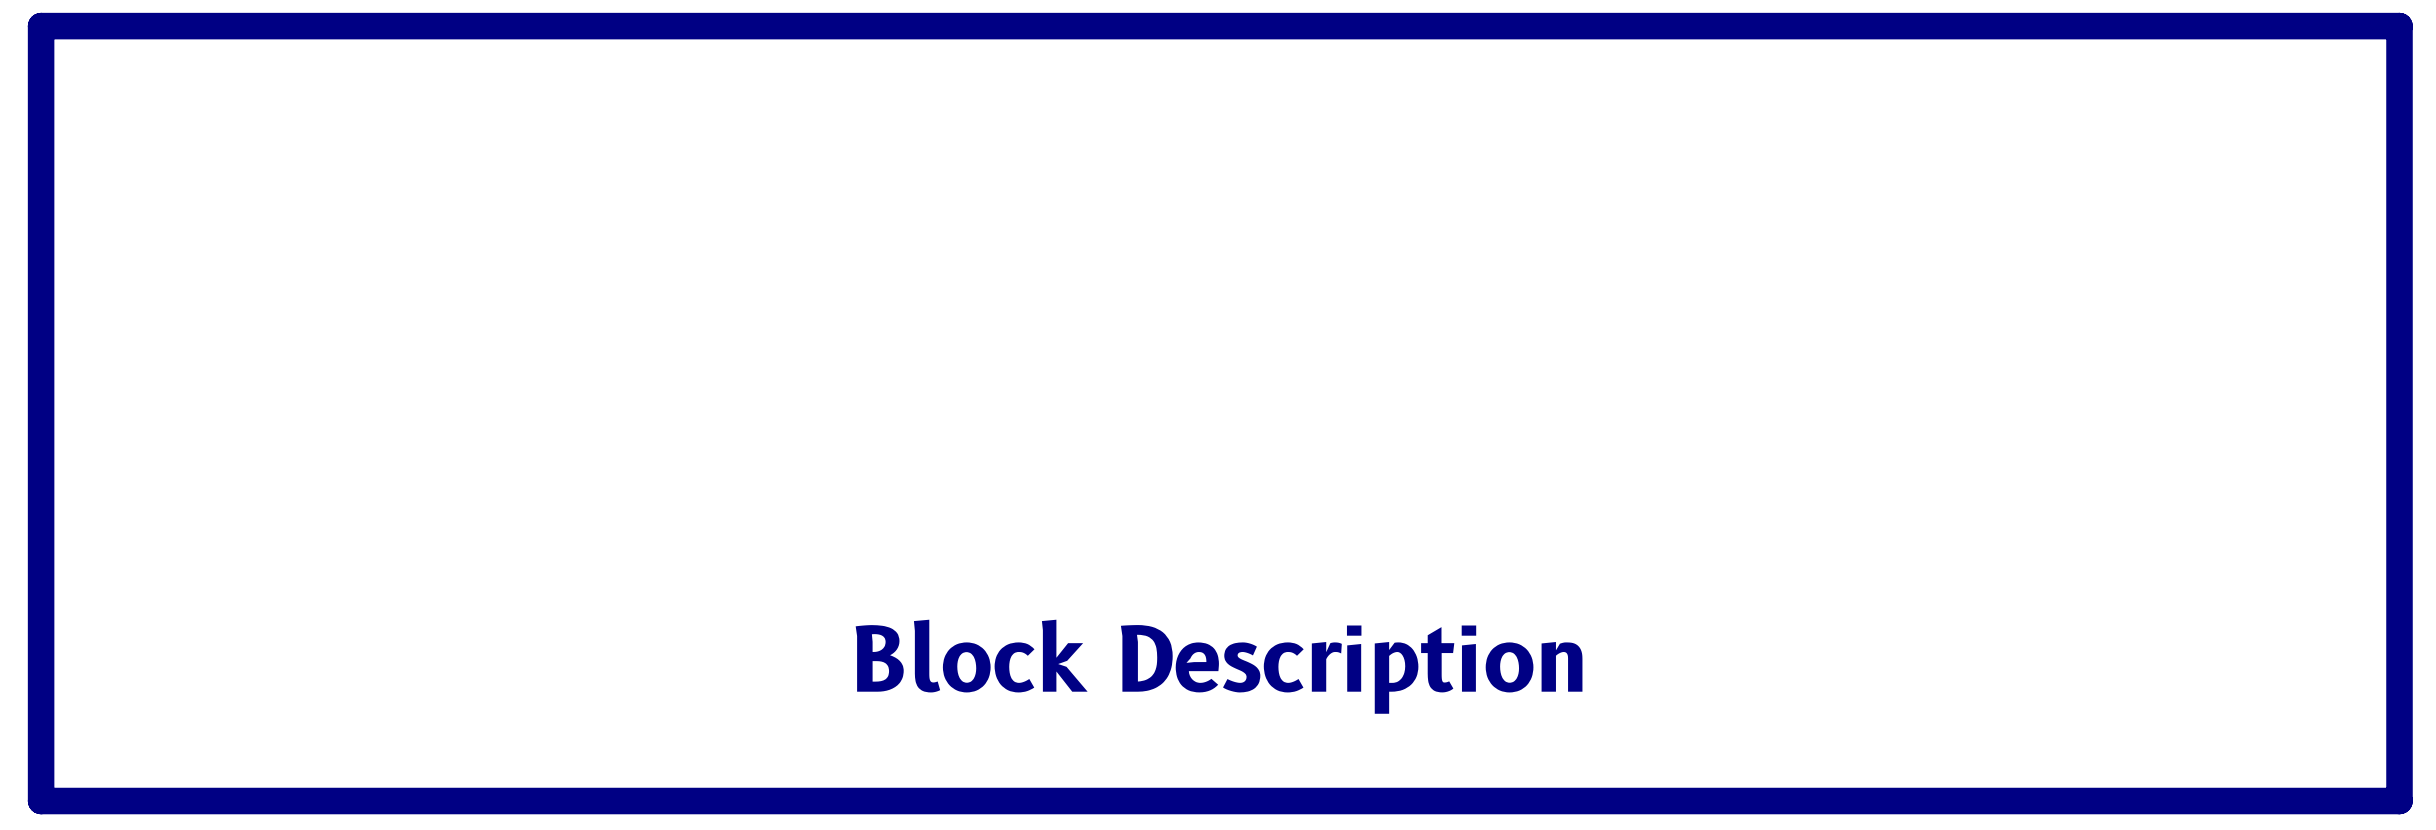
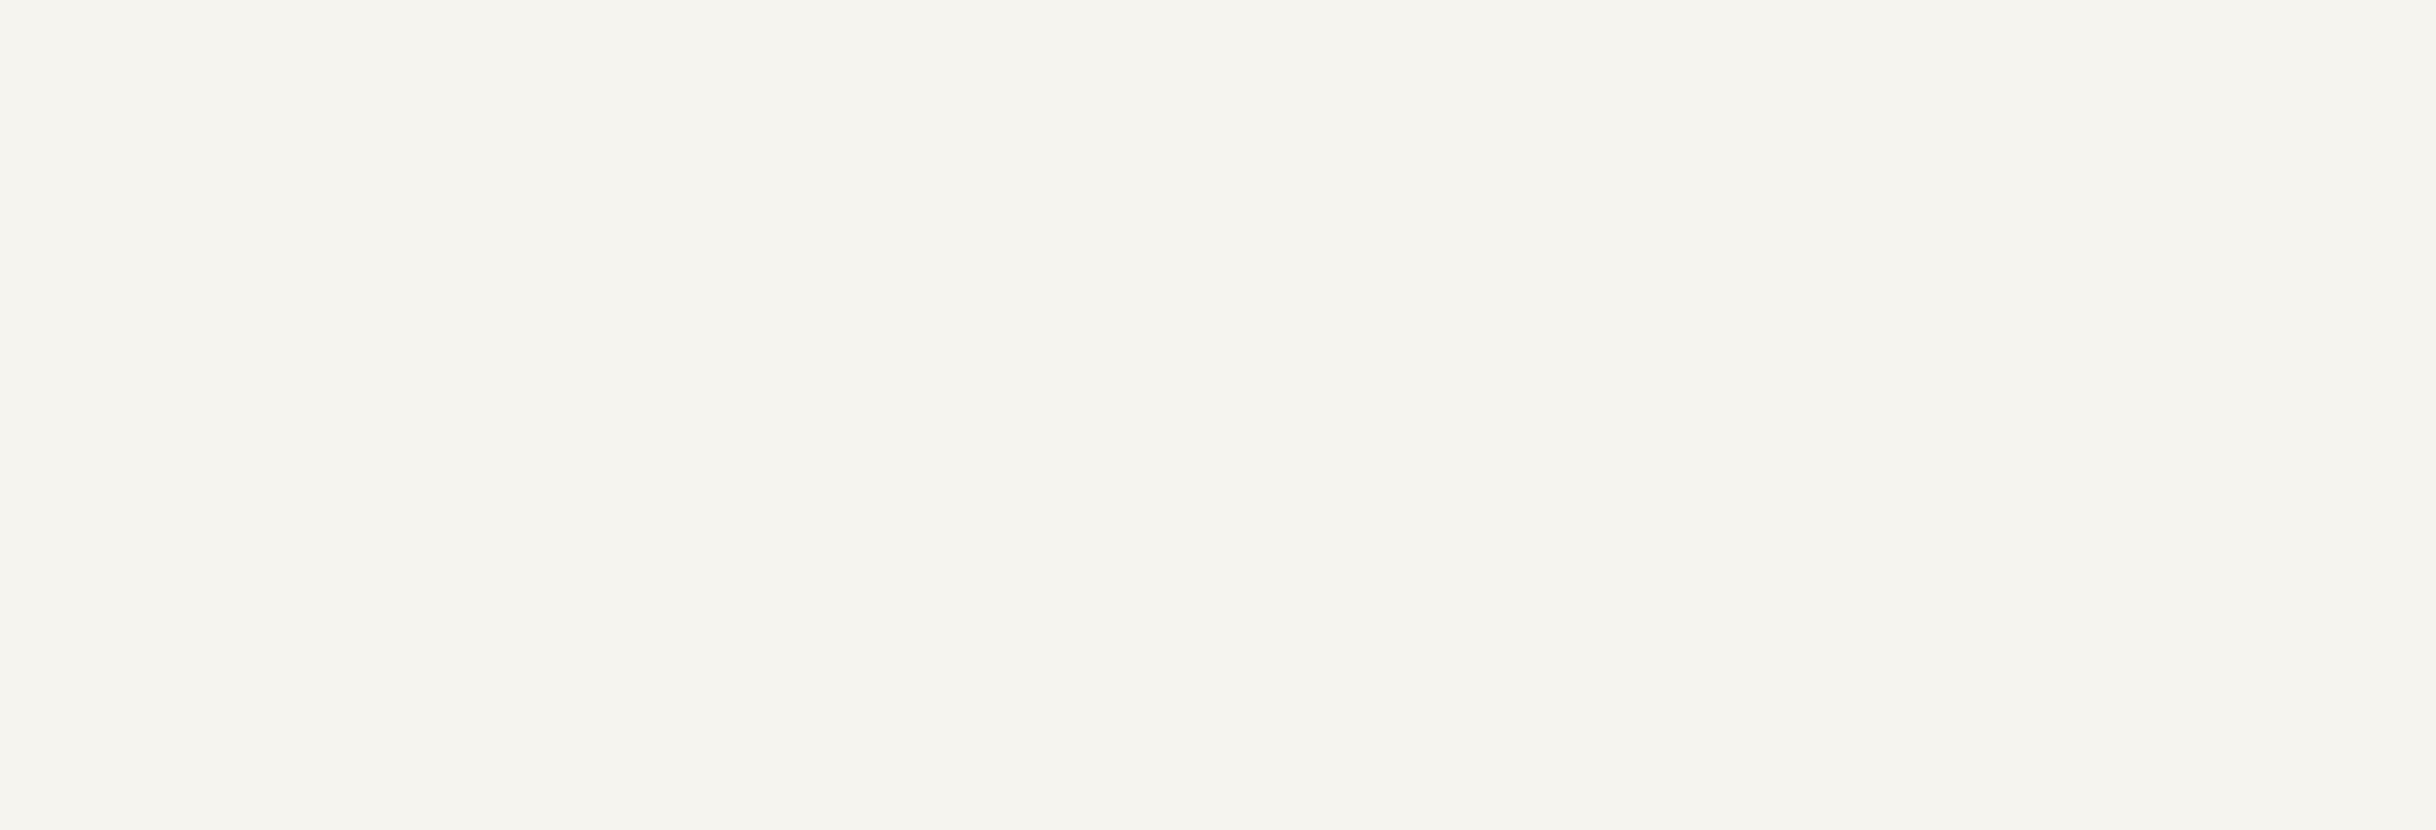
line: (41, 26) (2399, 26) (2399, 801) (41, 801) (41, 26) -> none
text: Block Description (1219, 666) -> none

